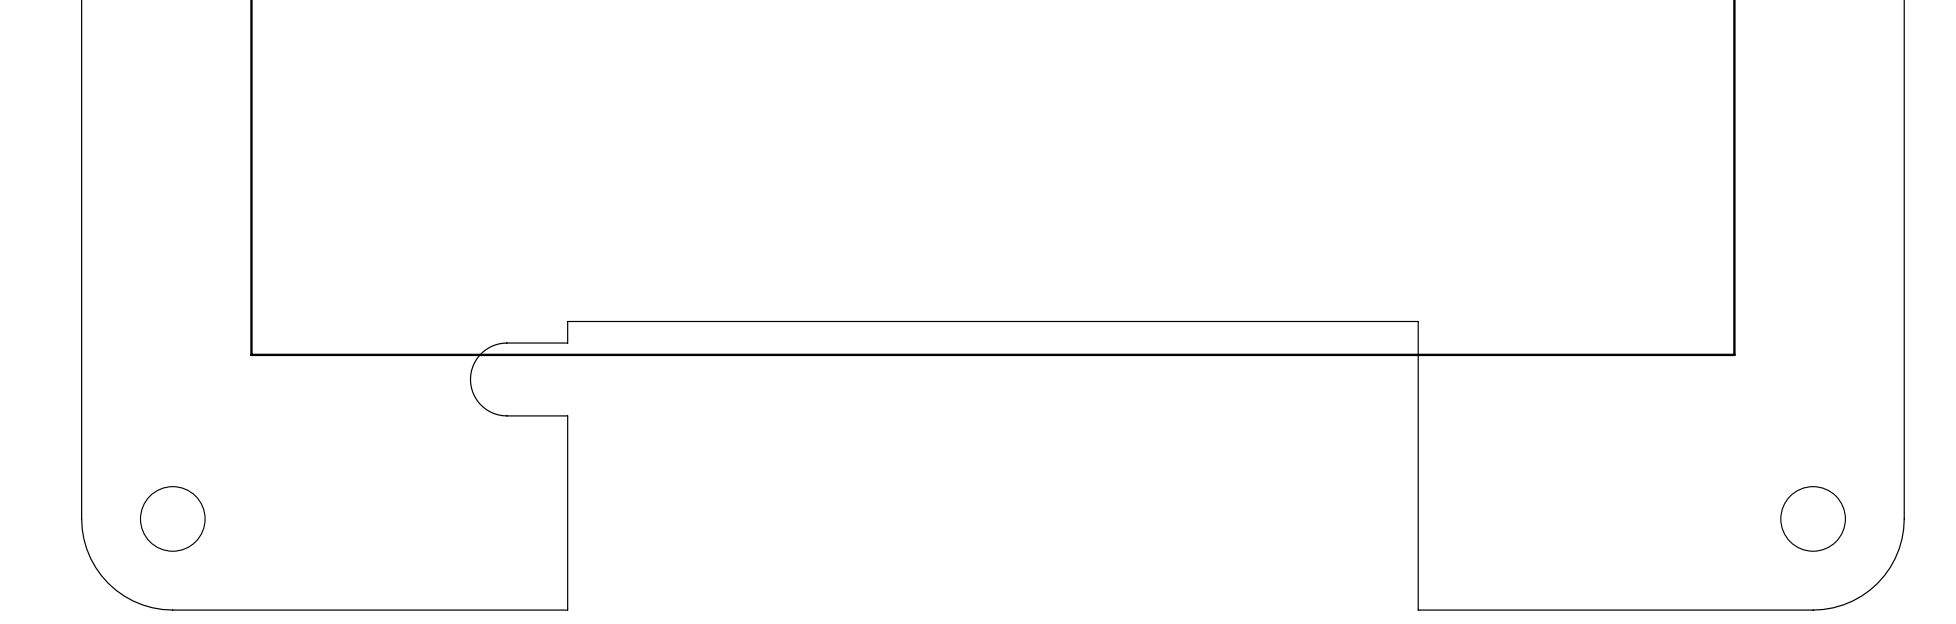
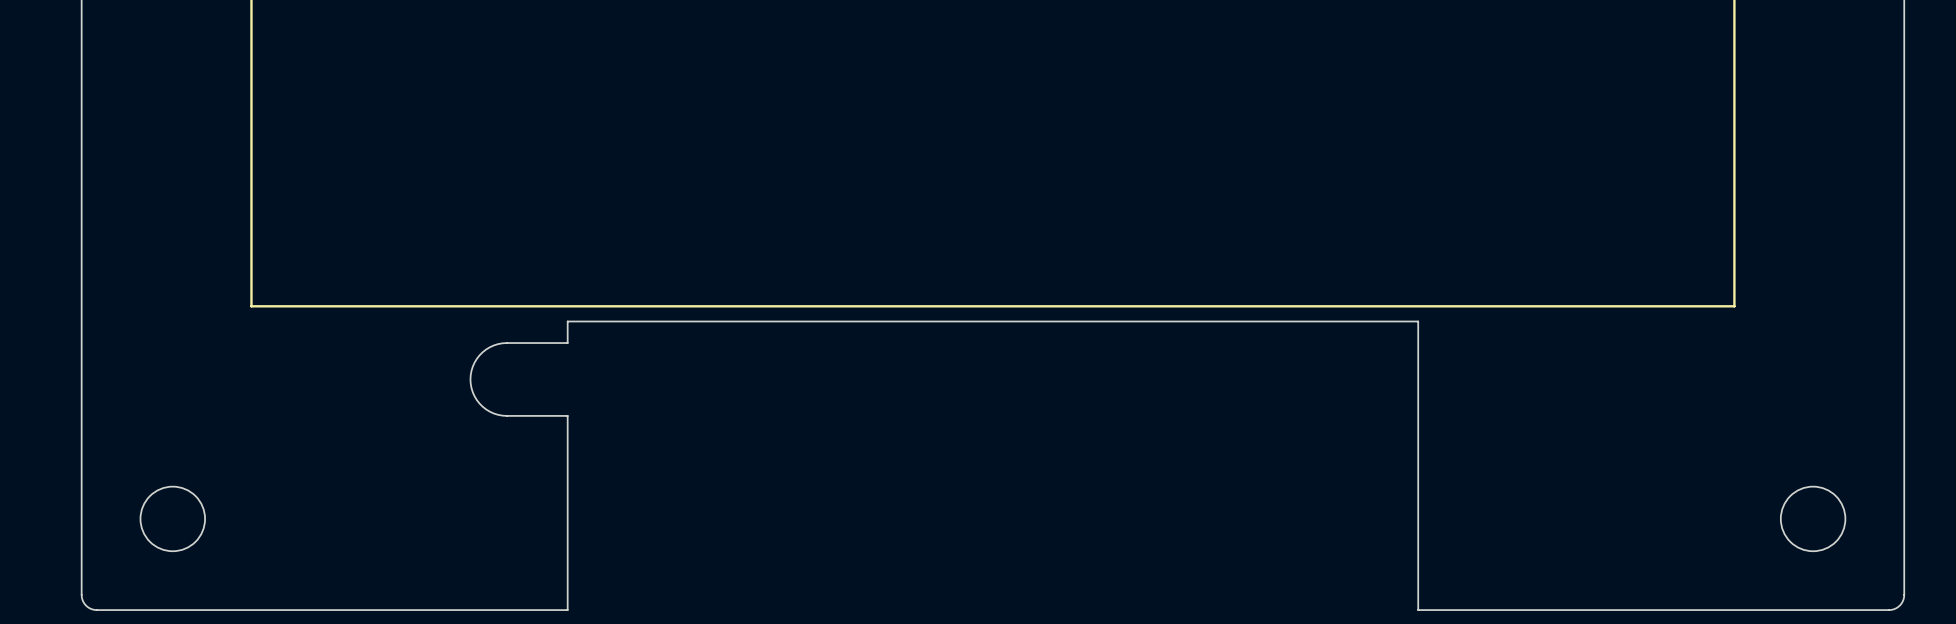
line: (1734, 306) (1734, 354) (251, 354) (251, 306) -> (1734, 306) (251, 306)
board edge: (81, 518) (86, 549) (95, 567) (108, 583) (124, 596) (142, 604) (172, 610) -> (81, 518) (81, 594) (86, 605) (96, 610) (172, 610)
board edge: (1904, 518) (1899, 549) (1890, 567) (1877, 583) (1861, 596) (1843, 604) (1813, 610) -> (1904, 518) (1904, 594) (1899, 605) (1889, 610) (1813, 610)

